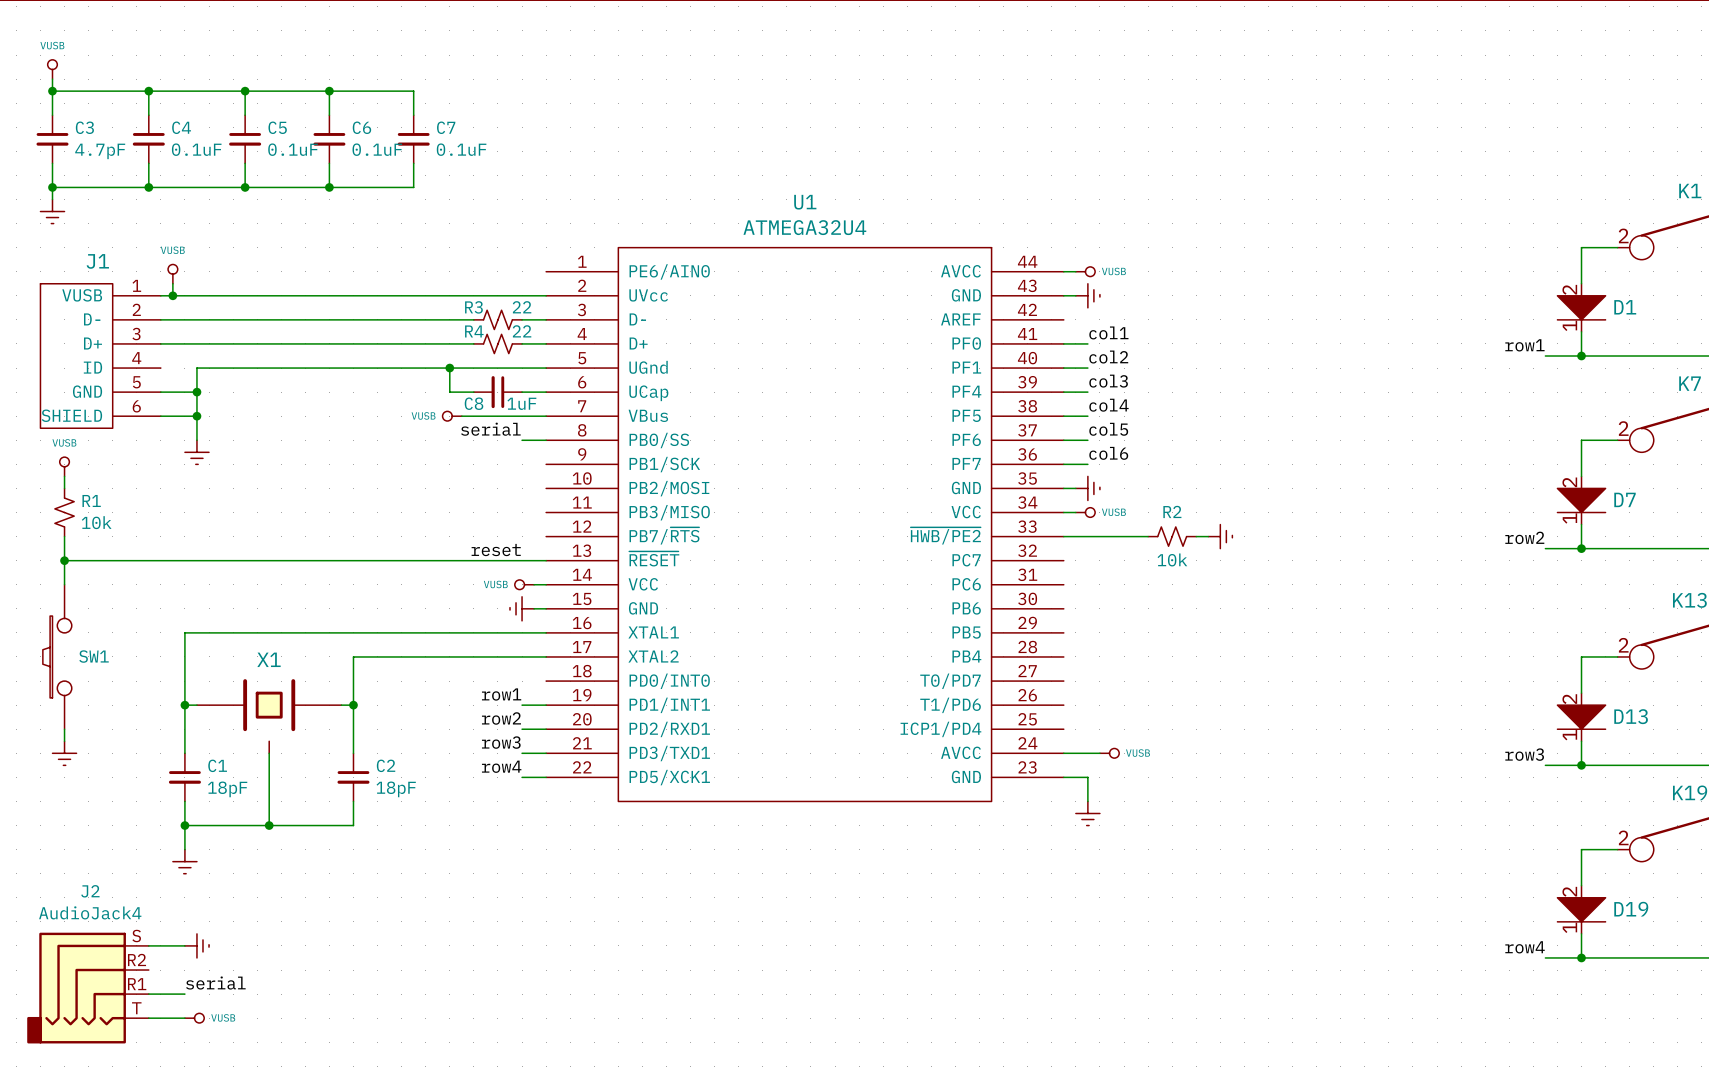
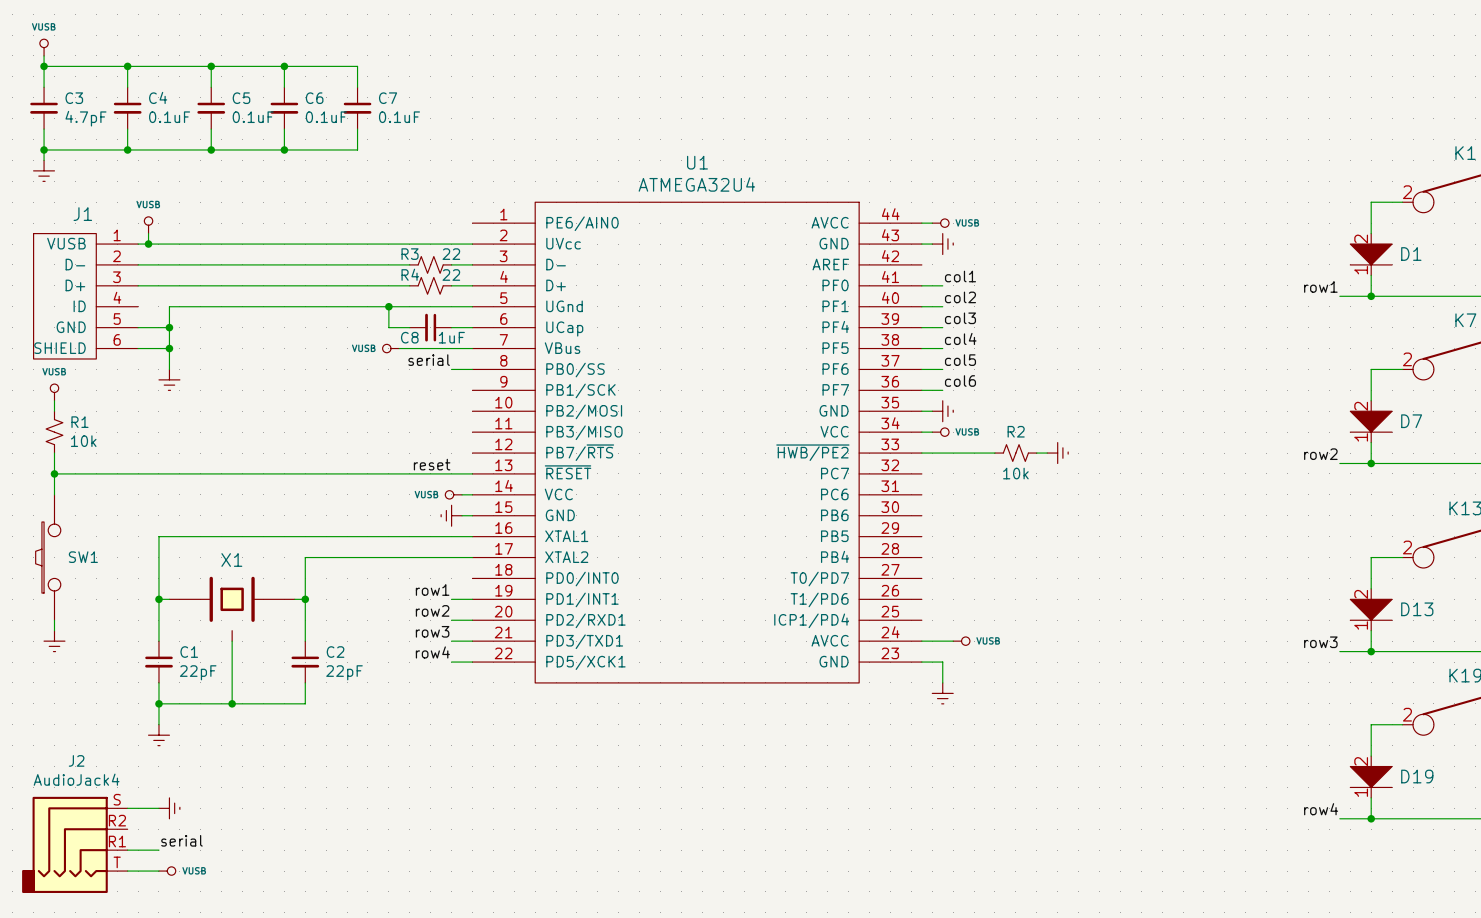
C1 value: 18pF (227, 789) -> 22pF (198, 672)
C2 value: 18pF (396, 789) -> 22pF (344, 672)

